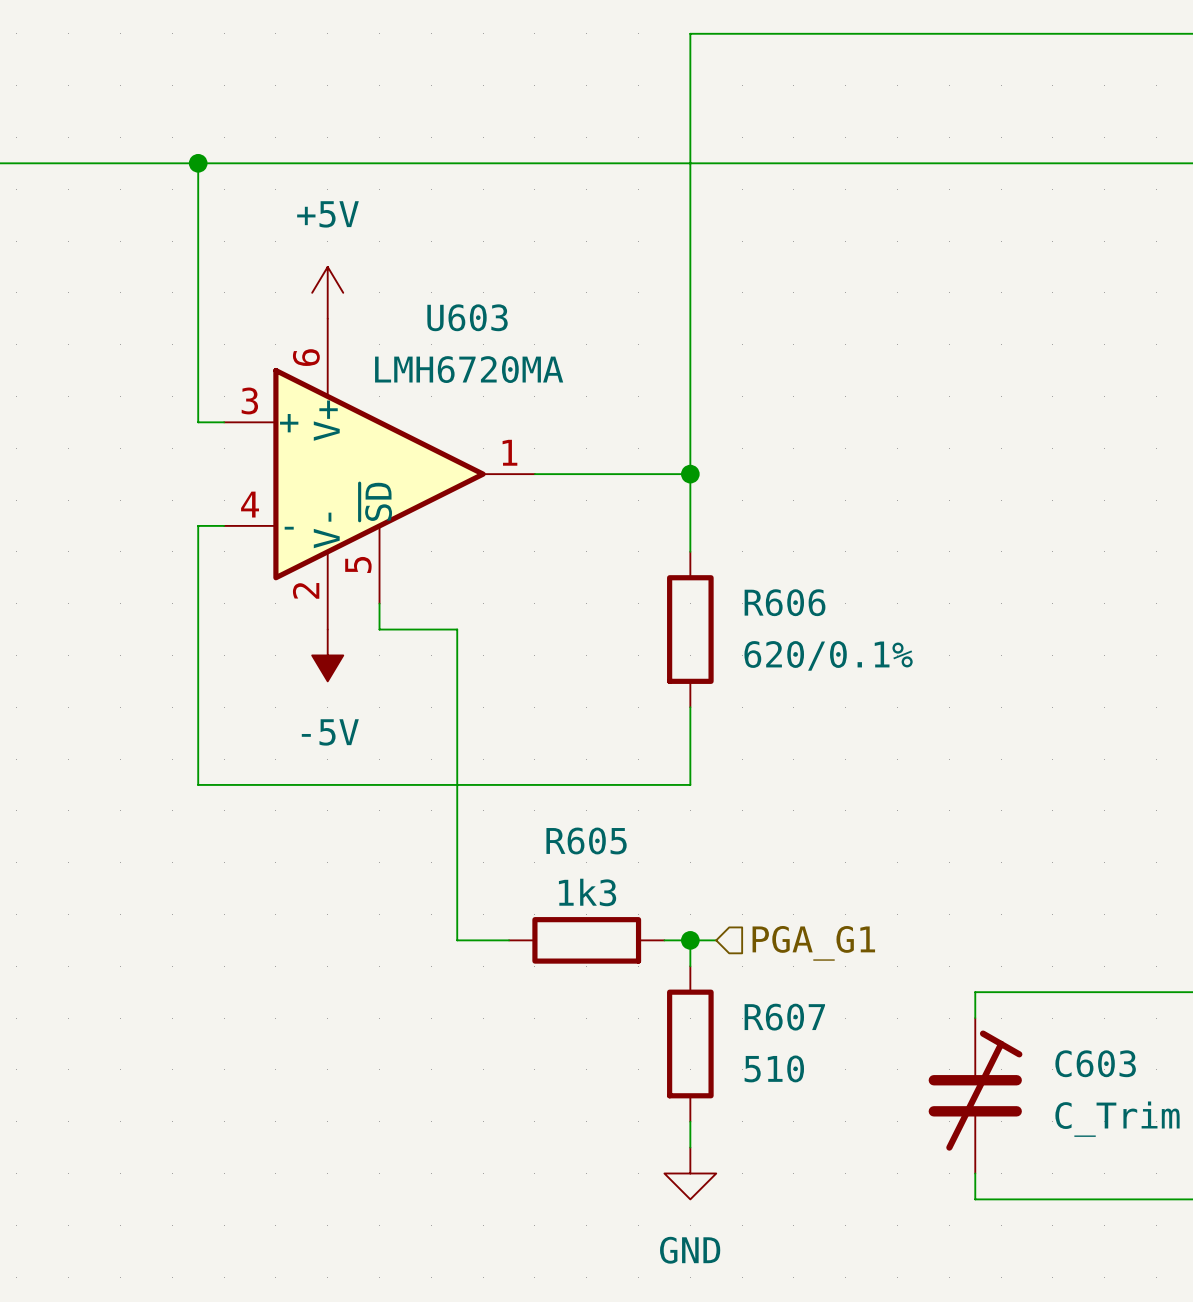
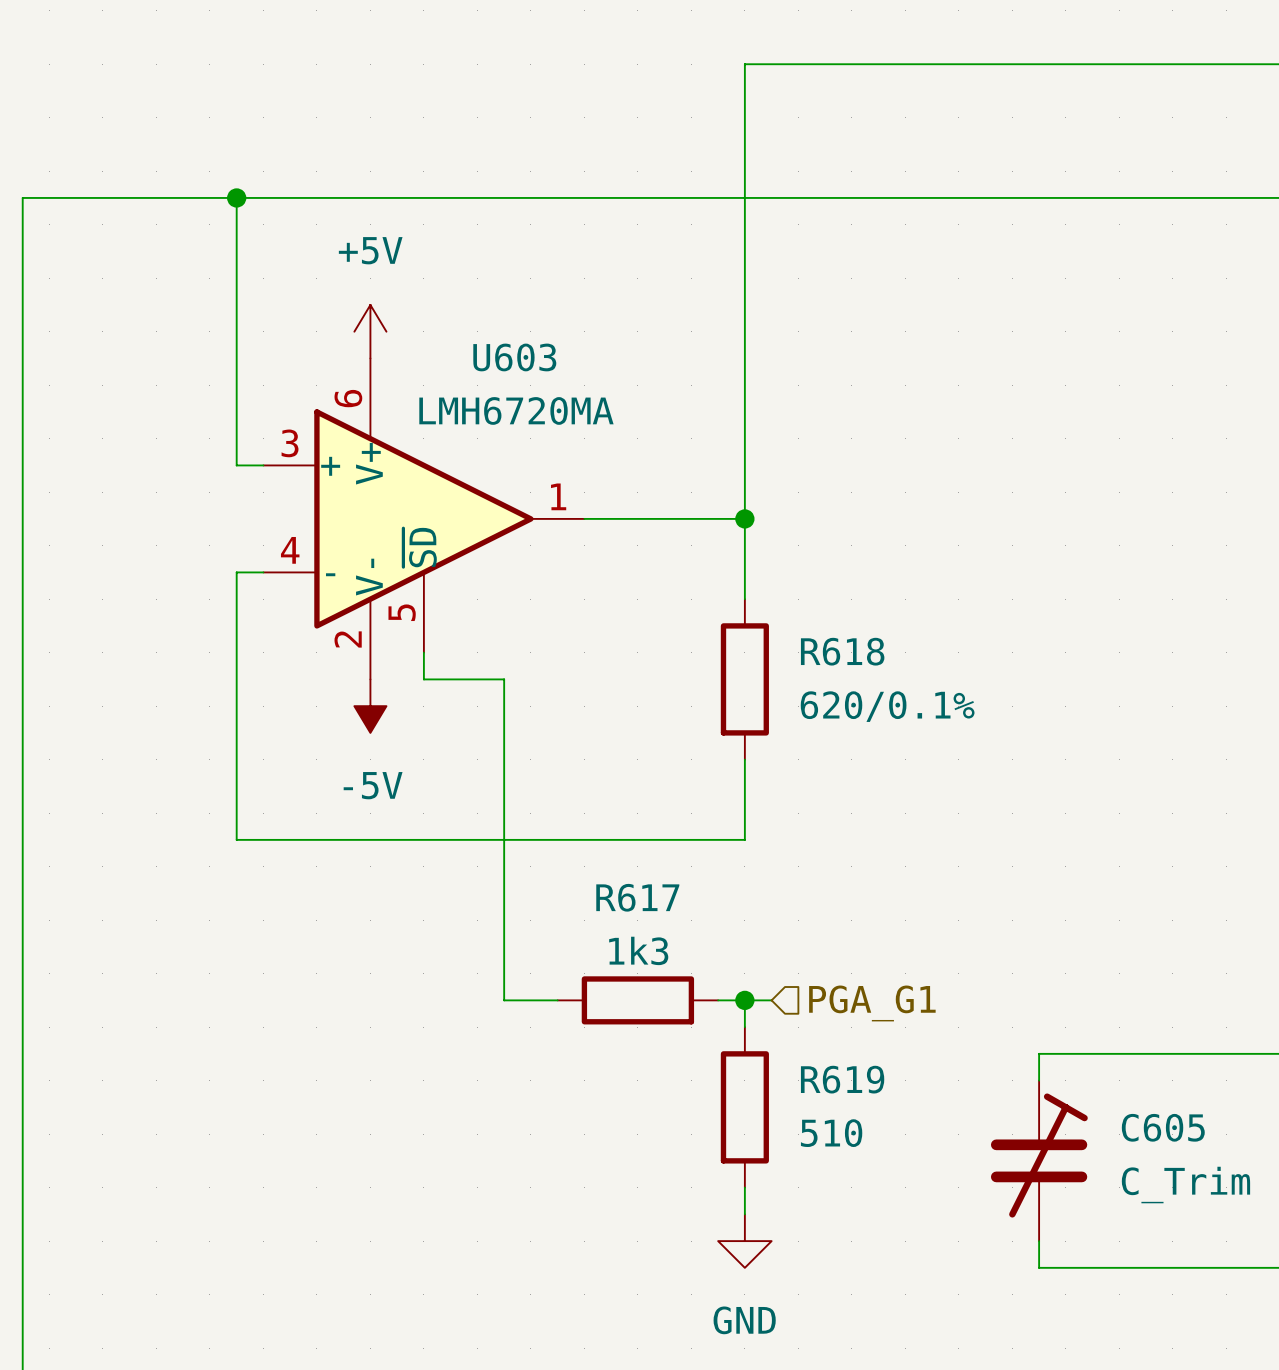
R606 name: R606 (785, 602) -> R618 (842, 651)
R605 name: R605 (586, 840) -> R617 (637, 897)
R607 name: R607 (784, 1017) -> R619 (842, 1079)
C603 name: C603 (1095, 1063) -> C605 (1163, 1127)

